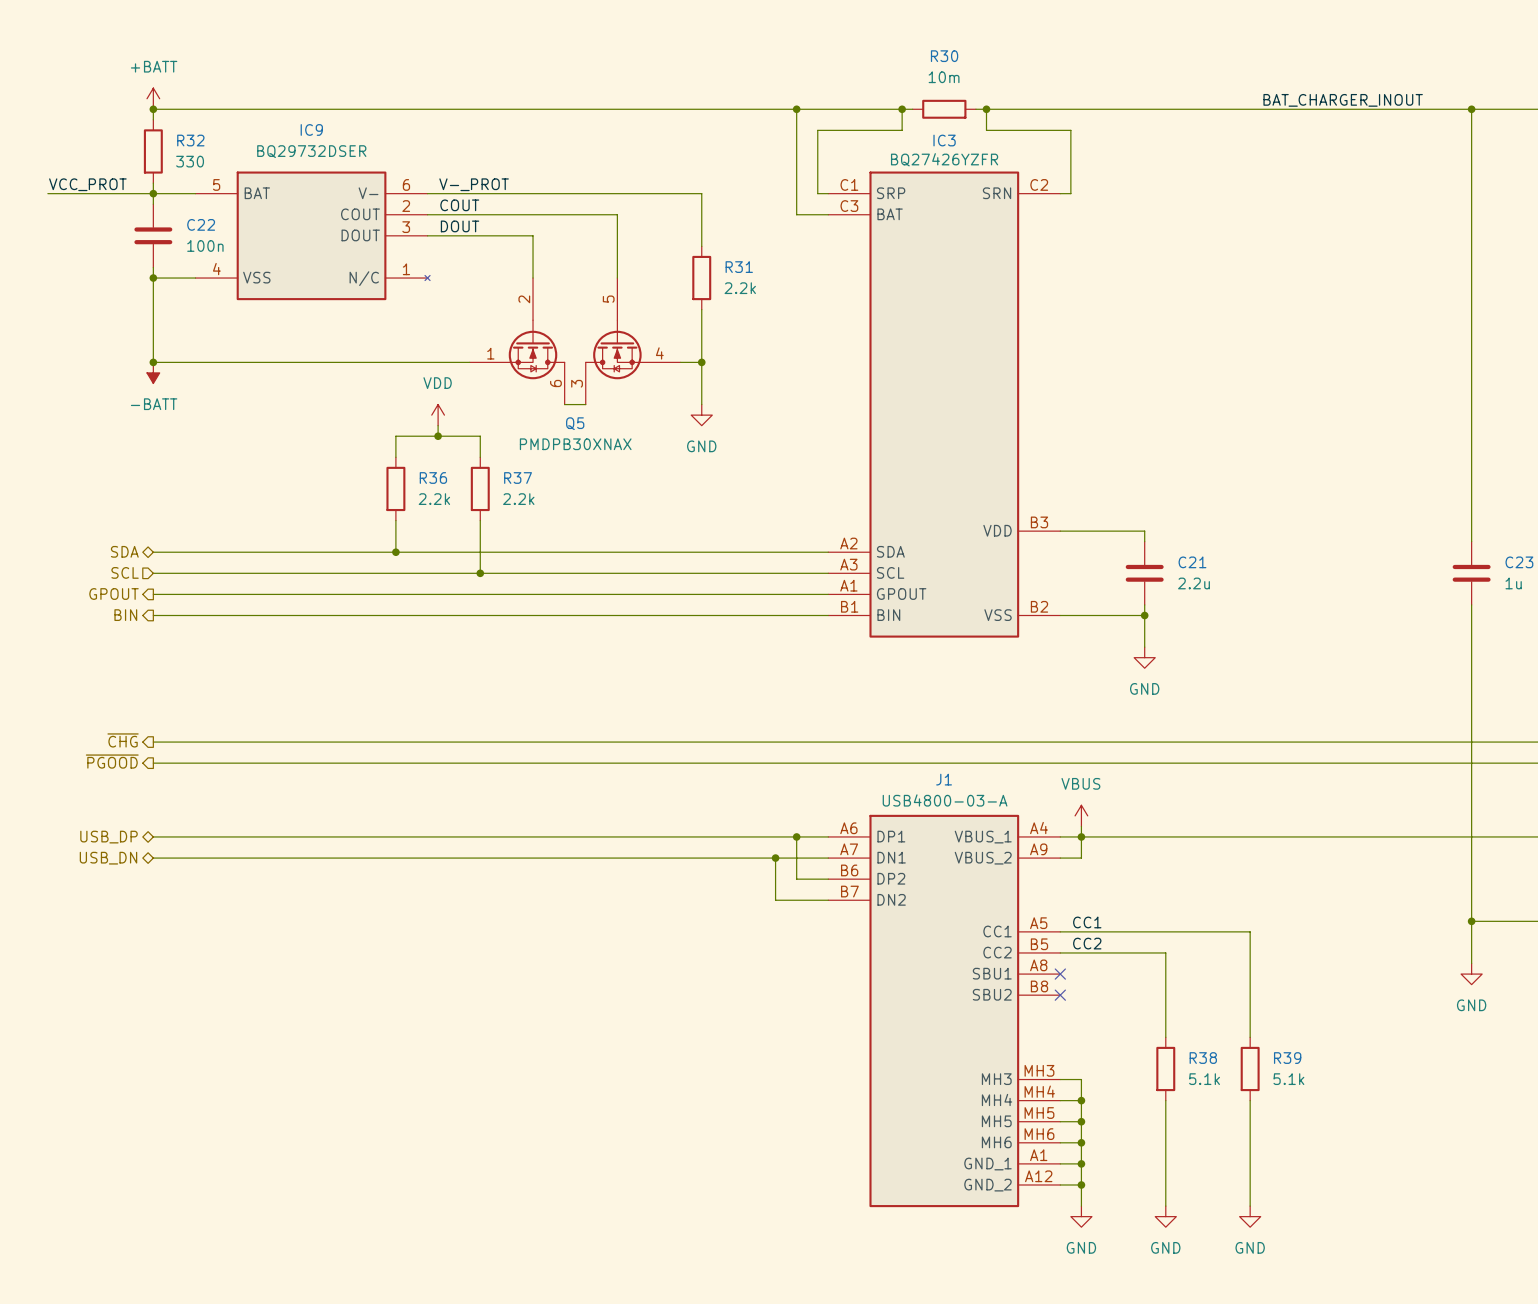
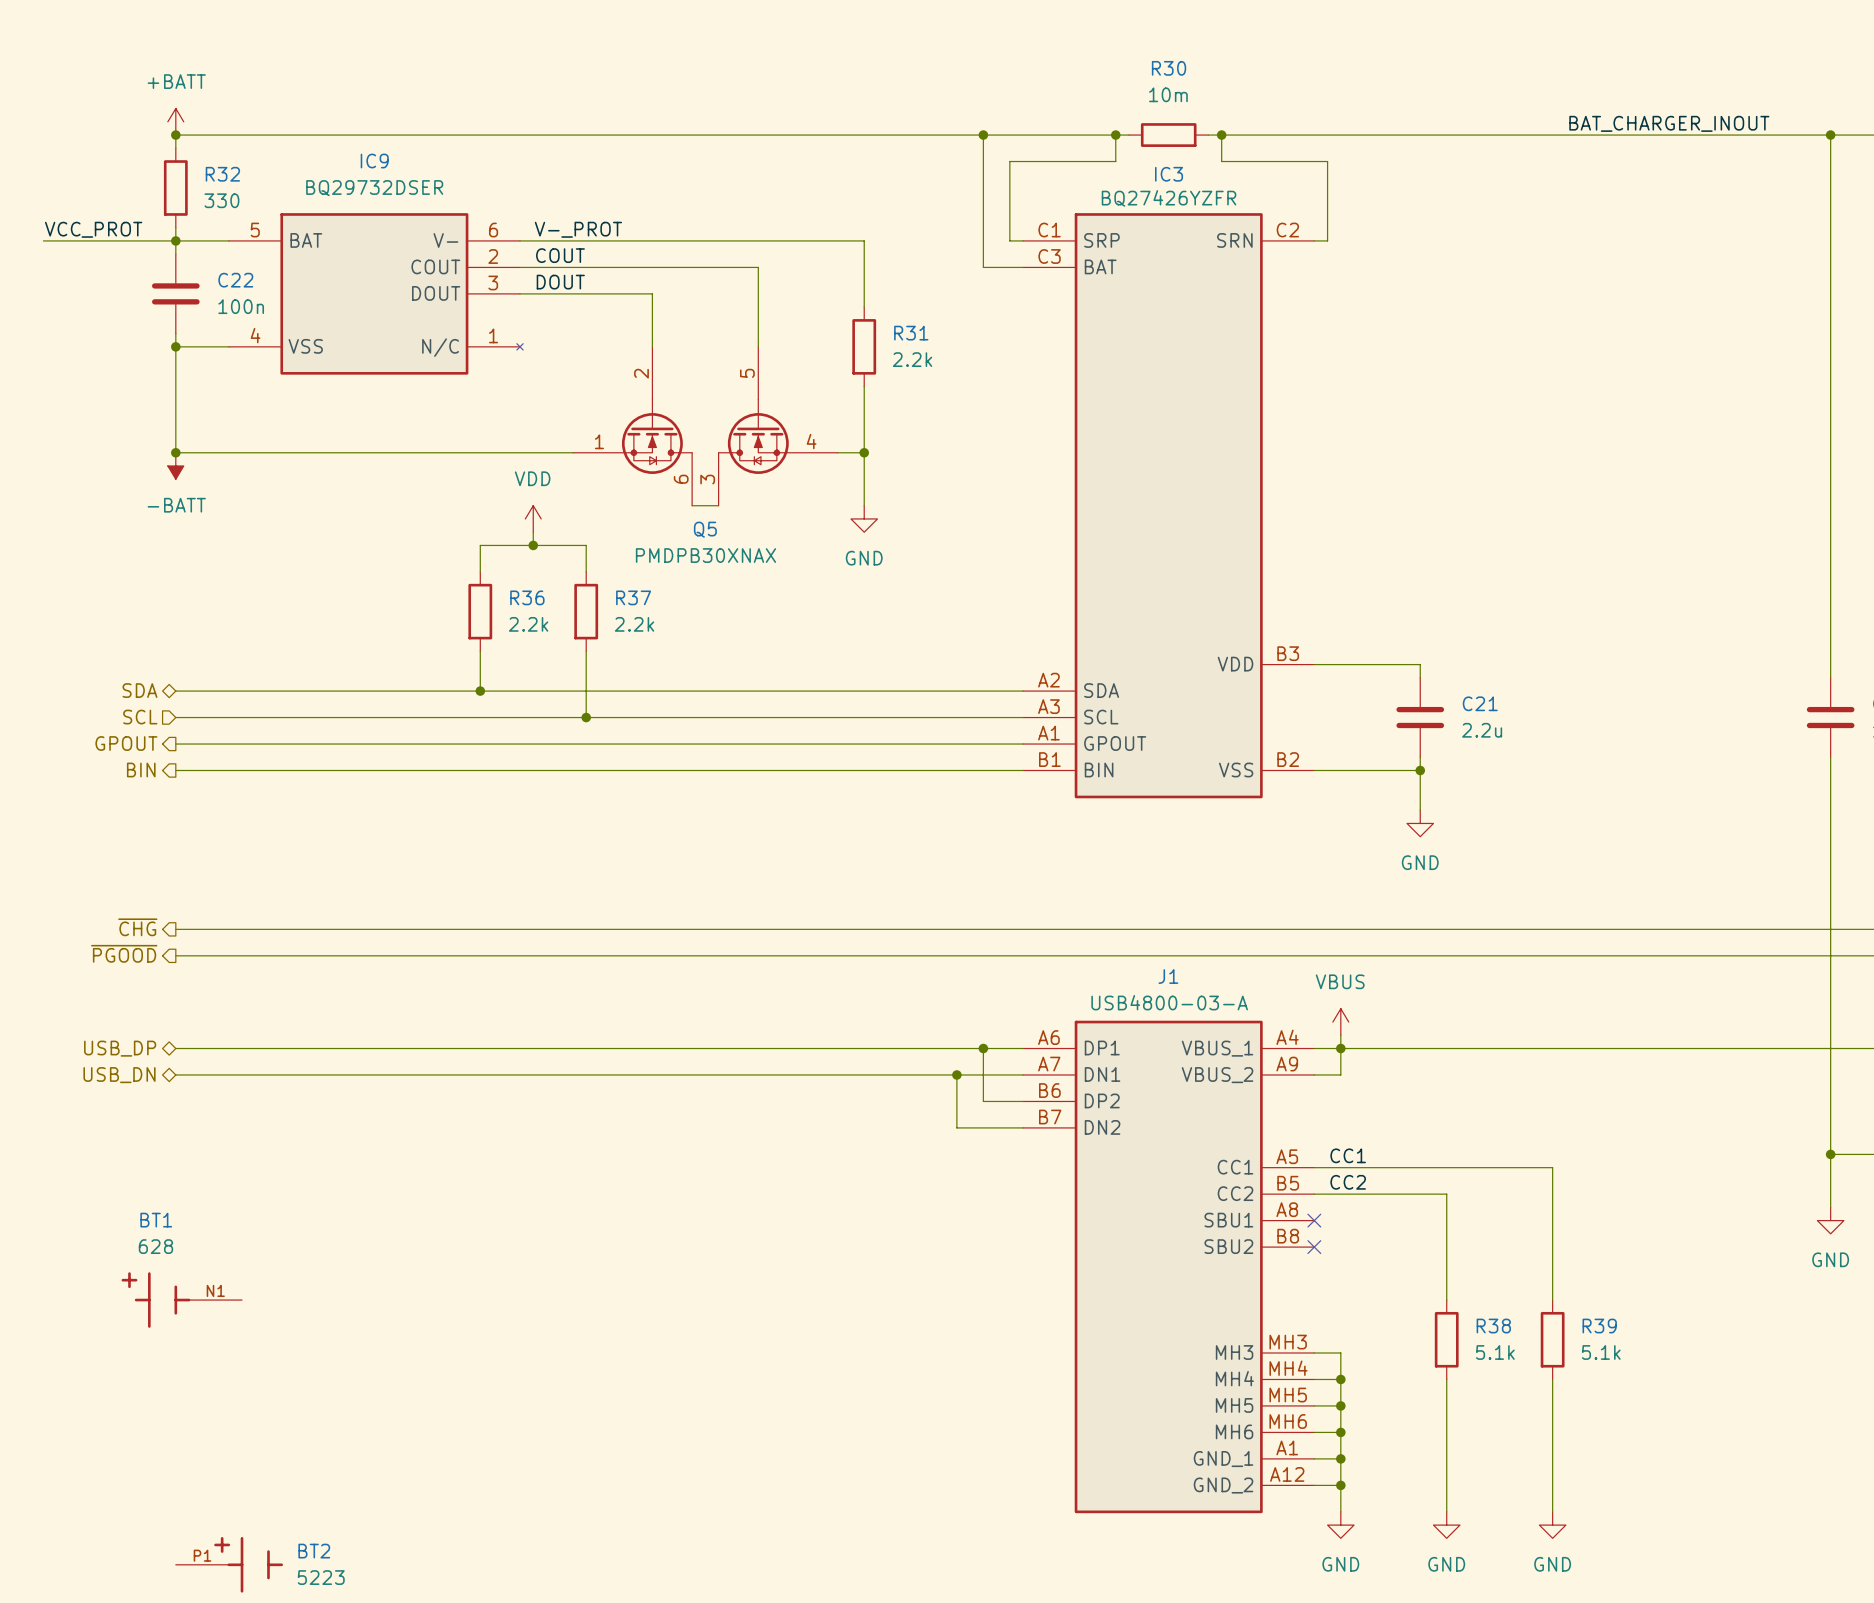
BT1: none -> 628 (181, 1300)
BT2: none -> 5223 (229, 1564)

